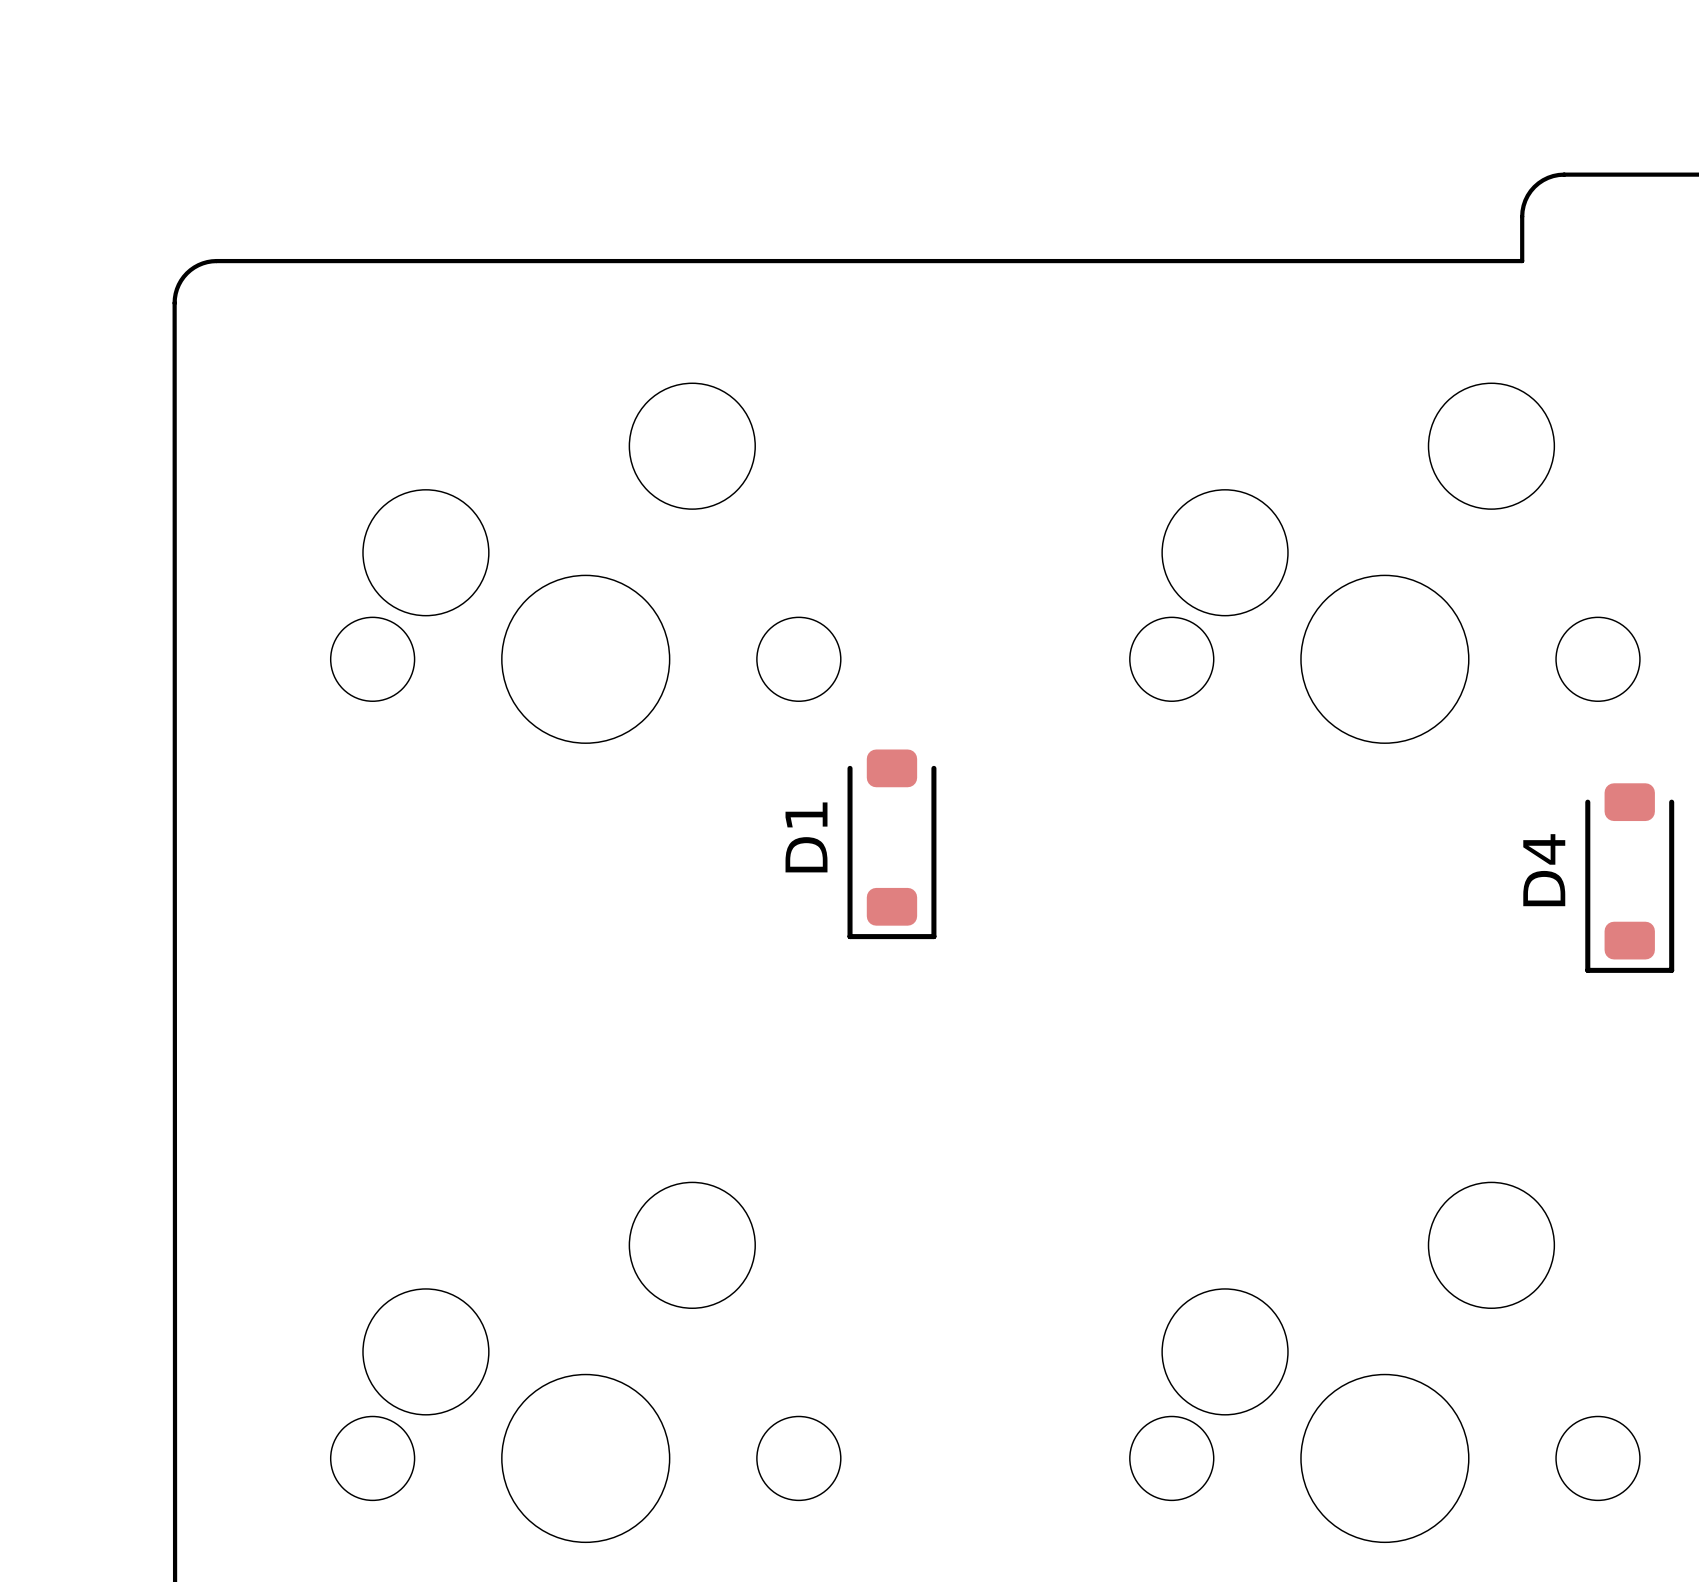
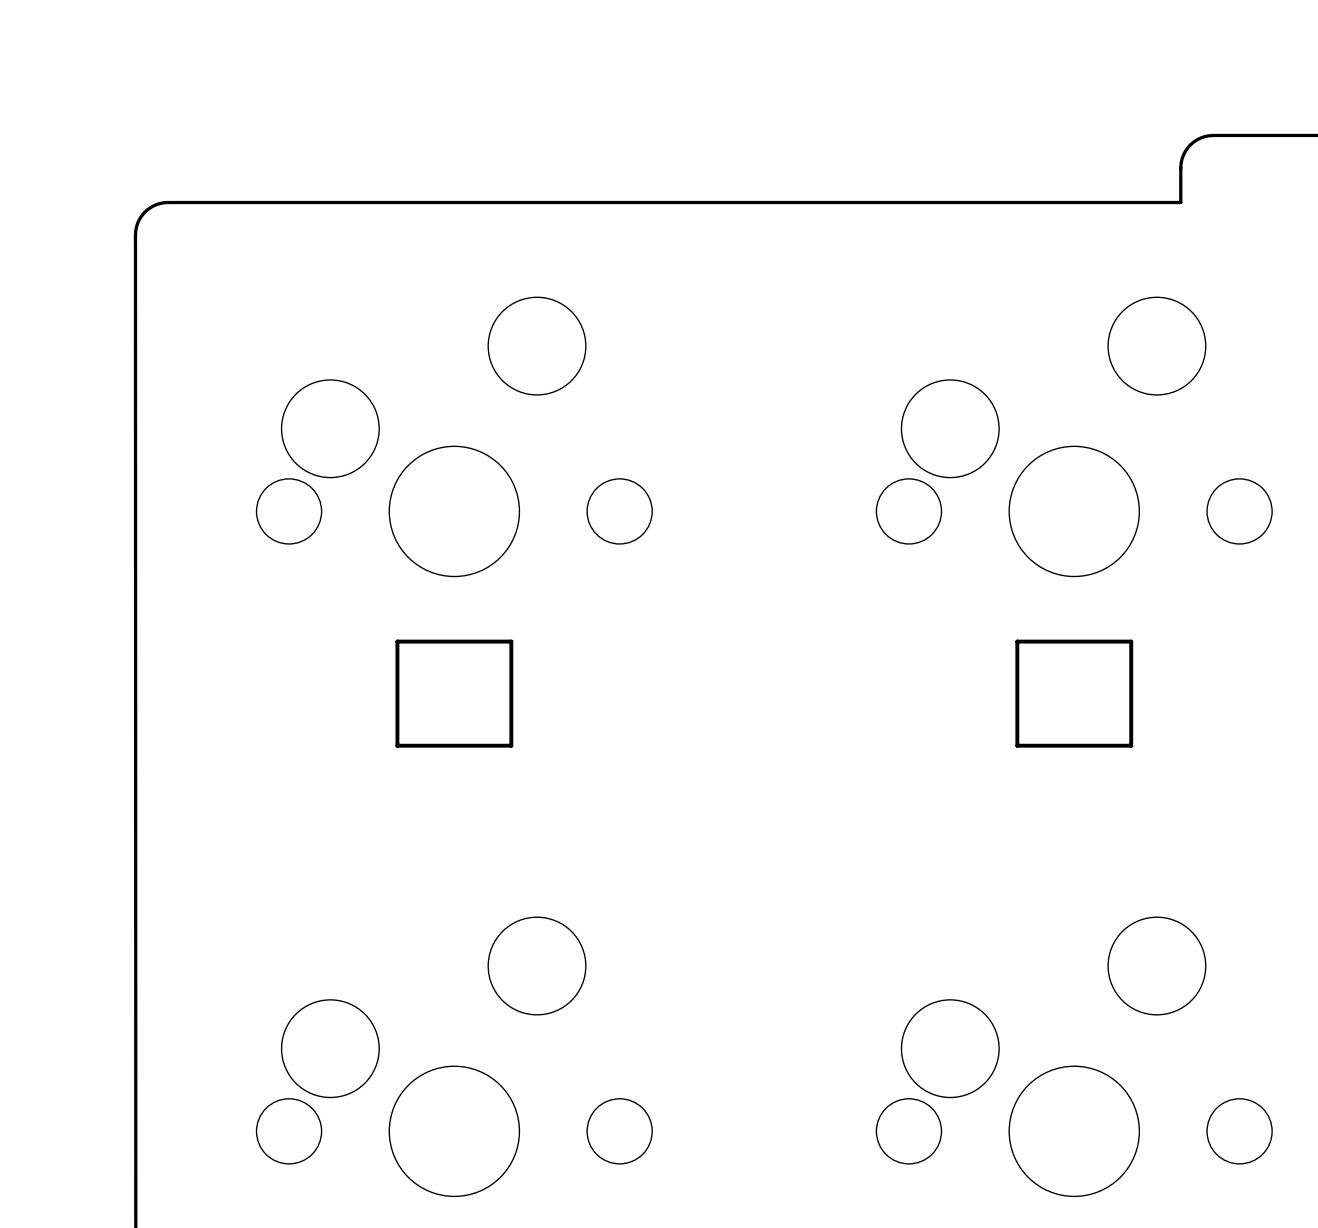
D1: (891, 844) -> none
D4: (1629, 878) -> none
part: none -> (454, 693)
part: none -> (1074, 693)

